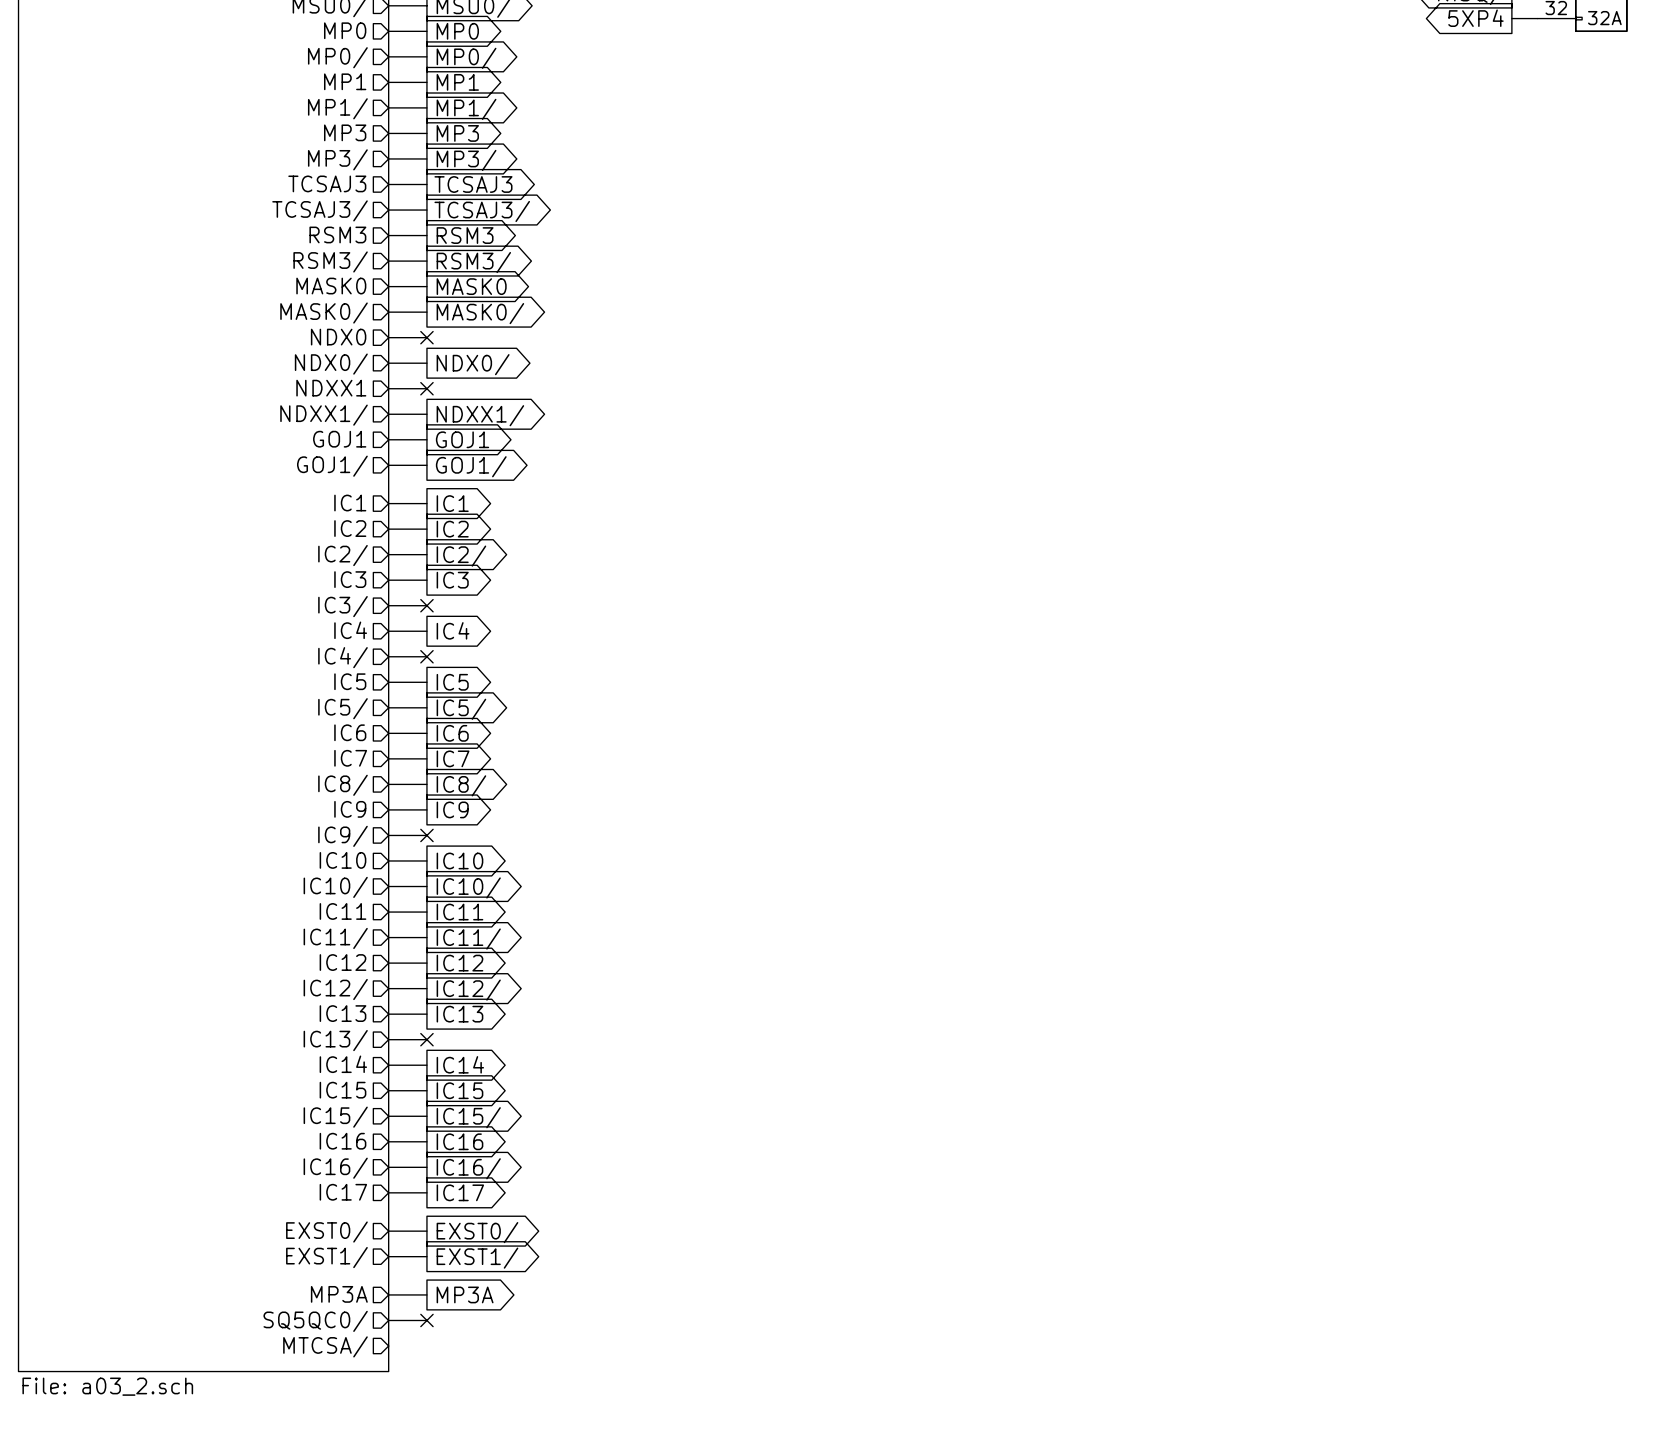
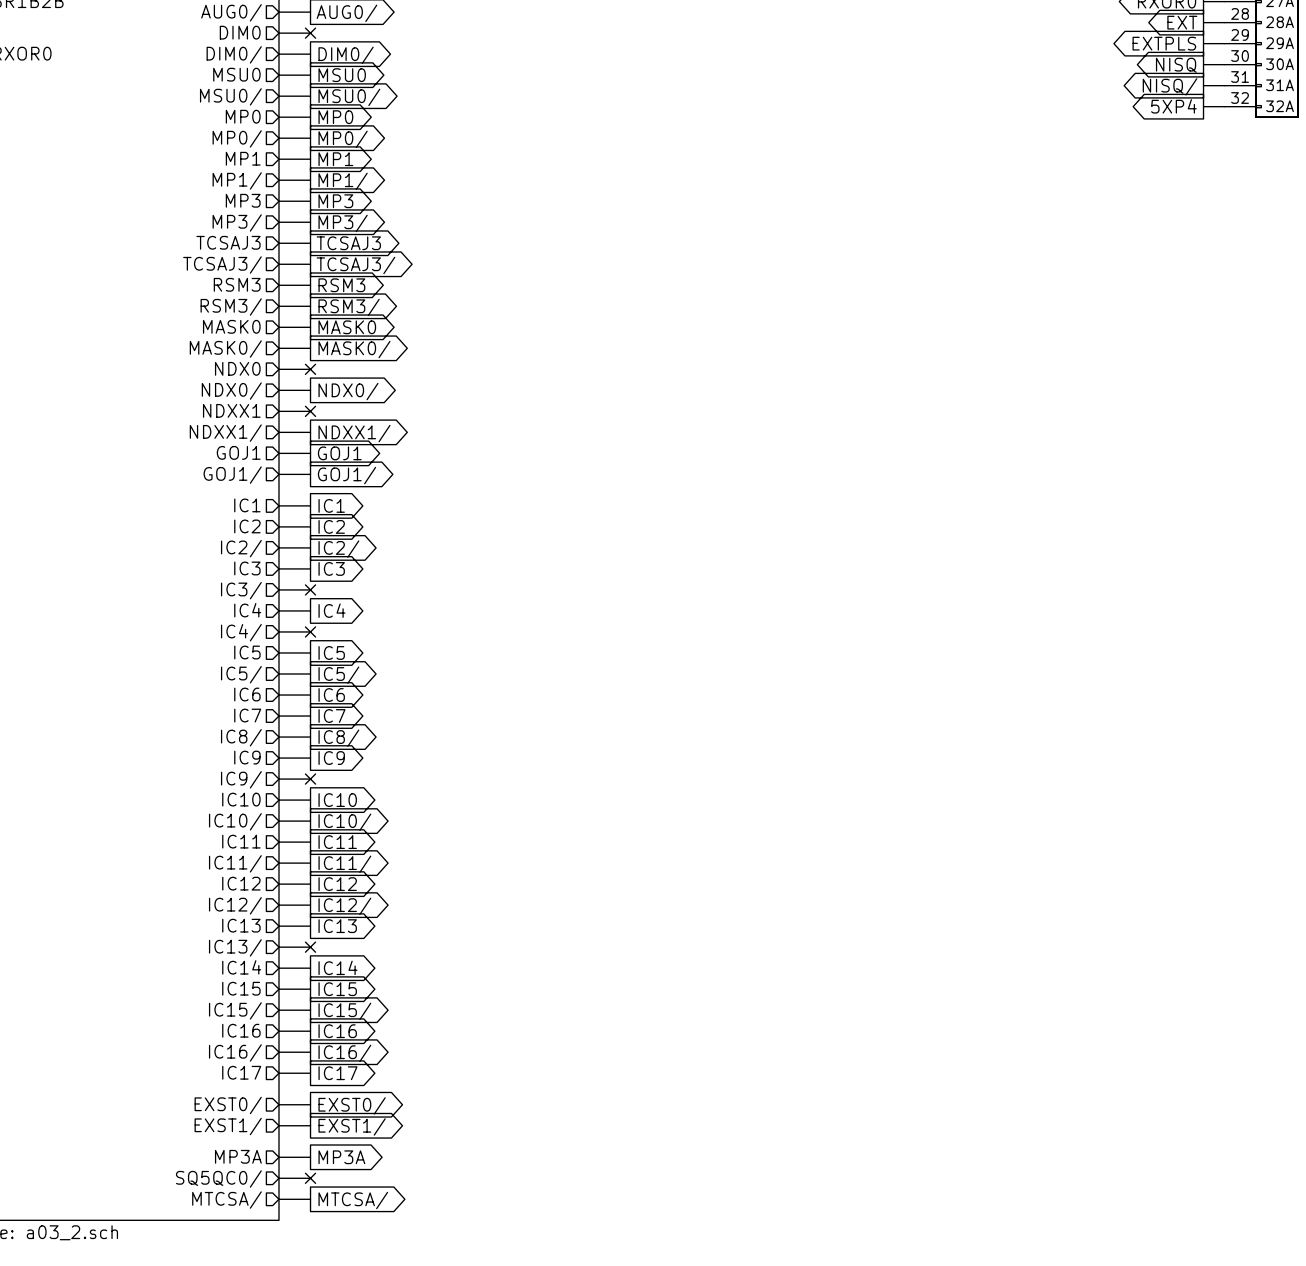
wire: none -> (278, 1199) (310, 1199)
global label: none -> MTCSA/ (353, 1200)

